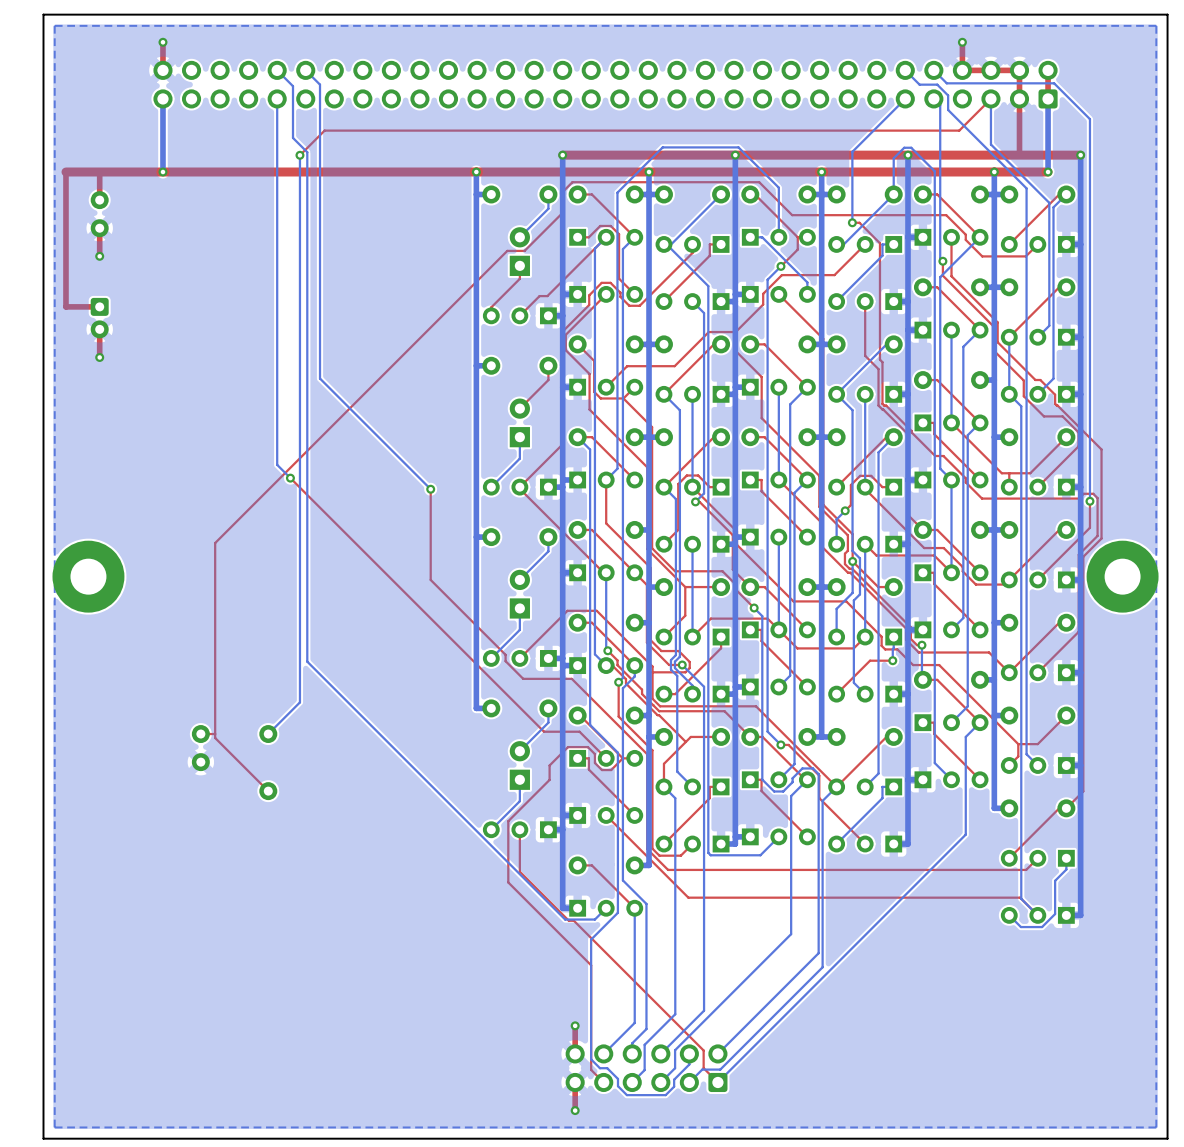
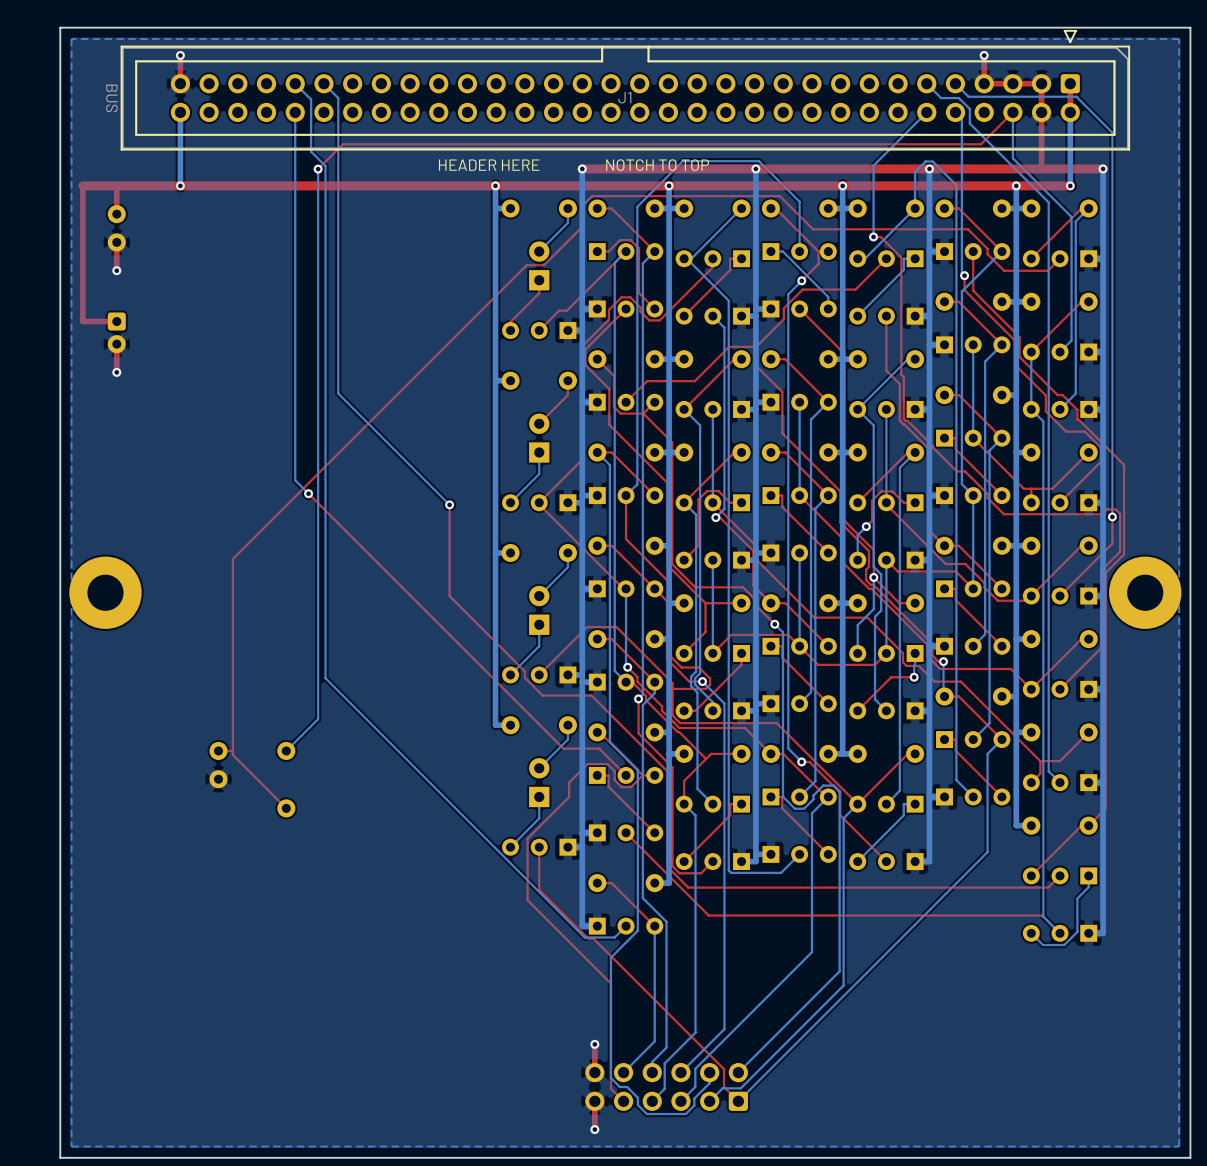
J1 side: top (605, 84) -> bottom (625, 90)
text: none -> HEADER HERE (489, 165)
text: none -> NOTCH TO TOP (657, 165)

